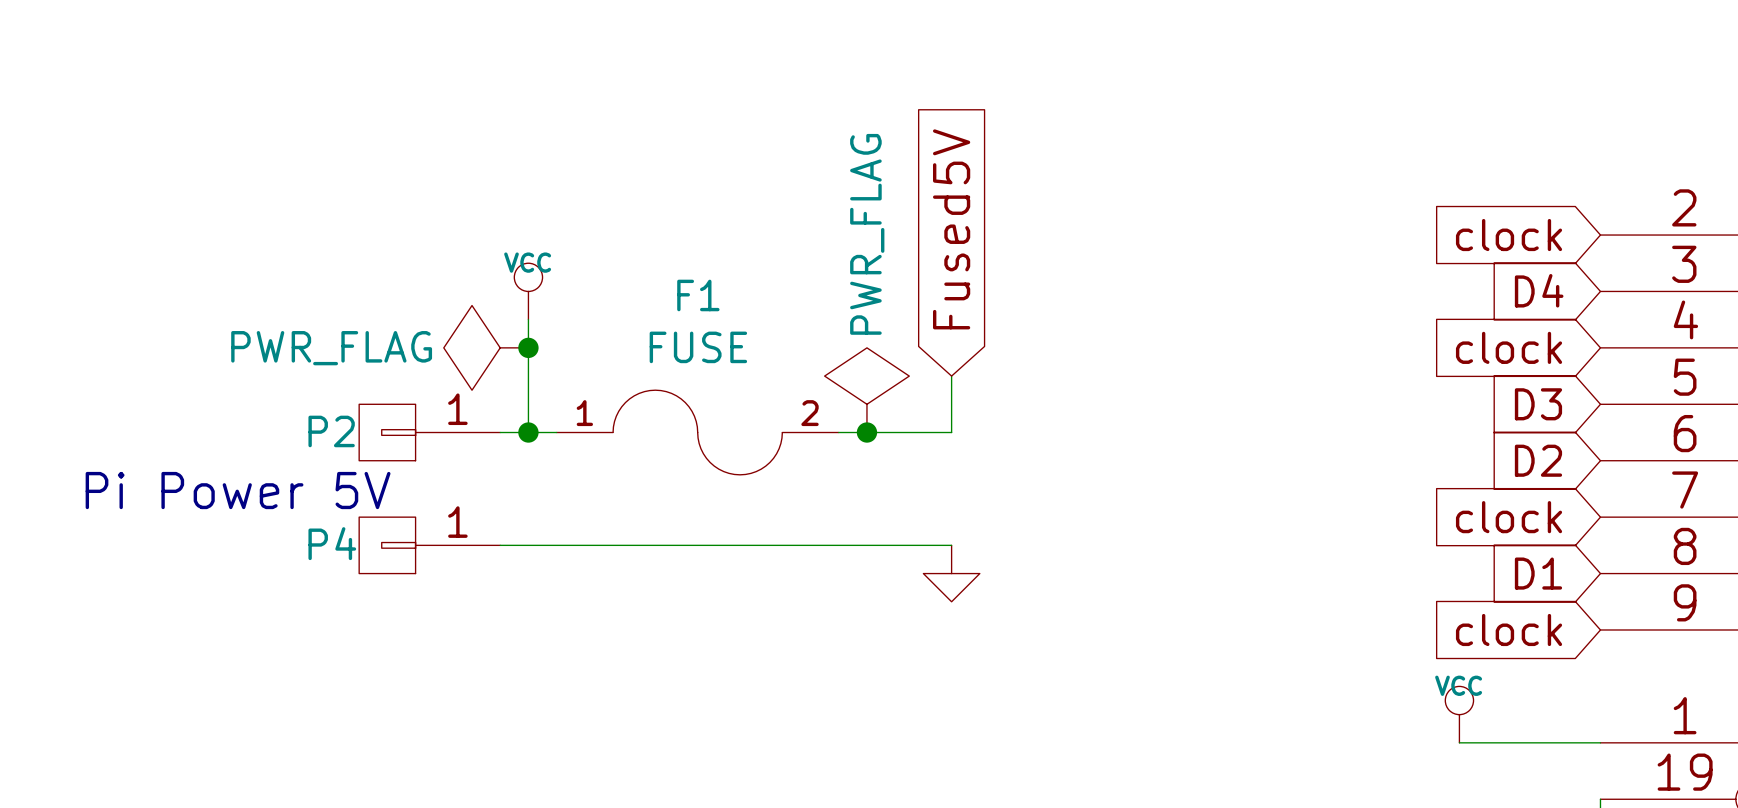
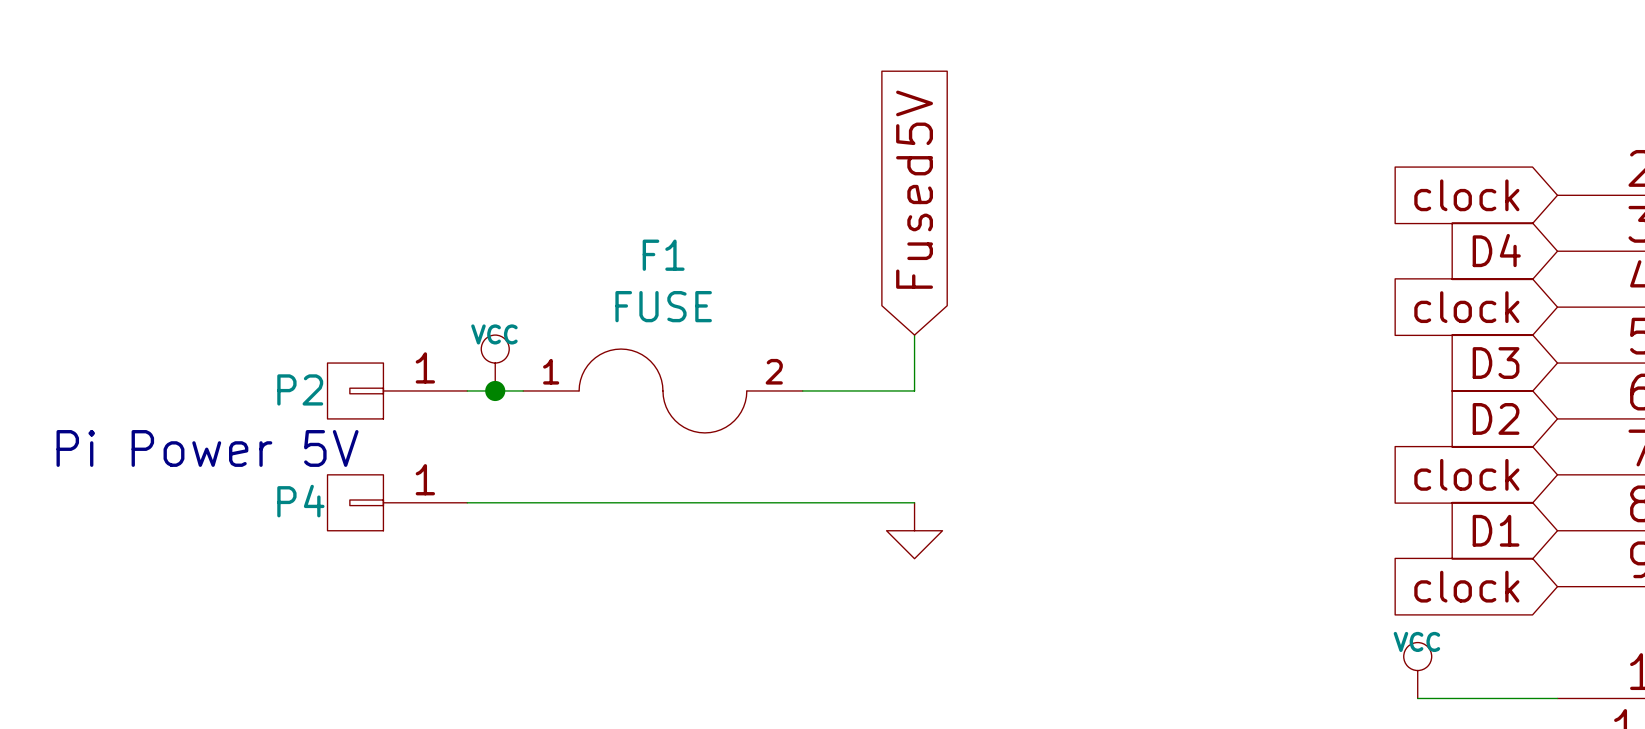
power symbol position: VCC (528, 291) -> VCC (495, 363)
wire: (528, 319) (528, 432) -> none
power symbol: PWR_FLAG (486, 347) -> none
junction: (528, 347) -> none
power symbol: PWR_FLAG (866, 390) -> none
junction: (866, 432) -> none

